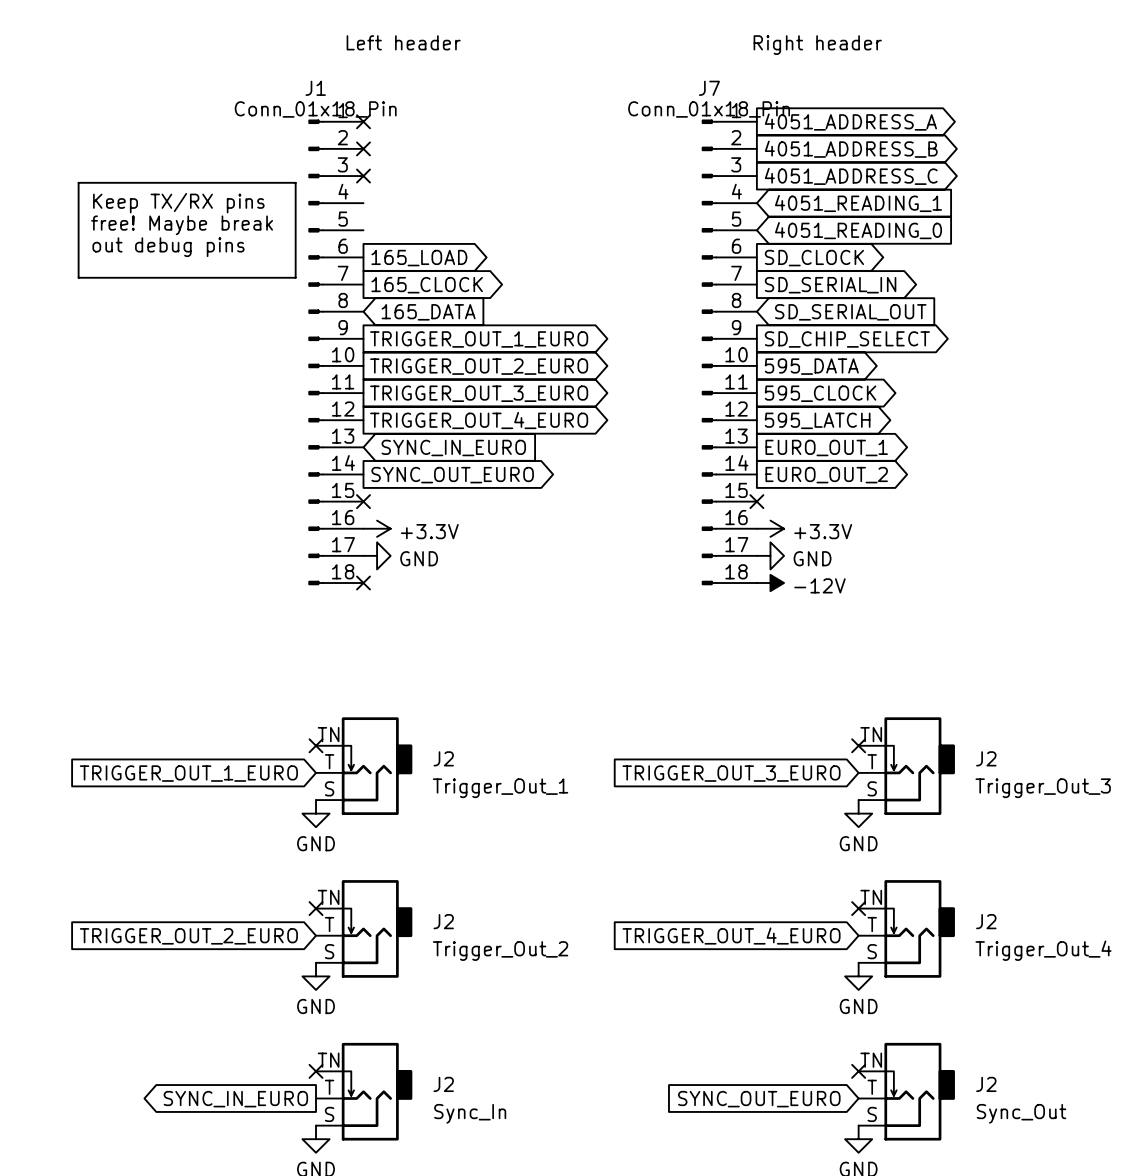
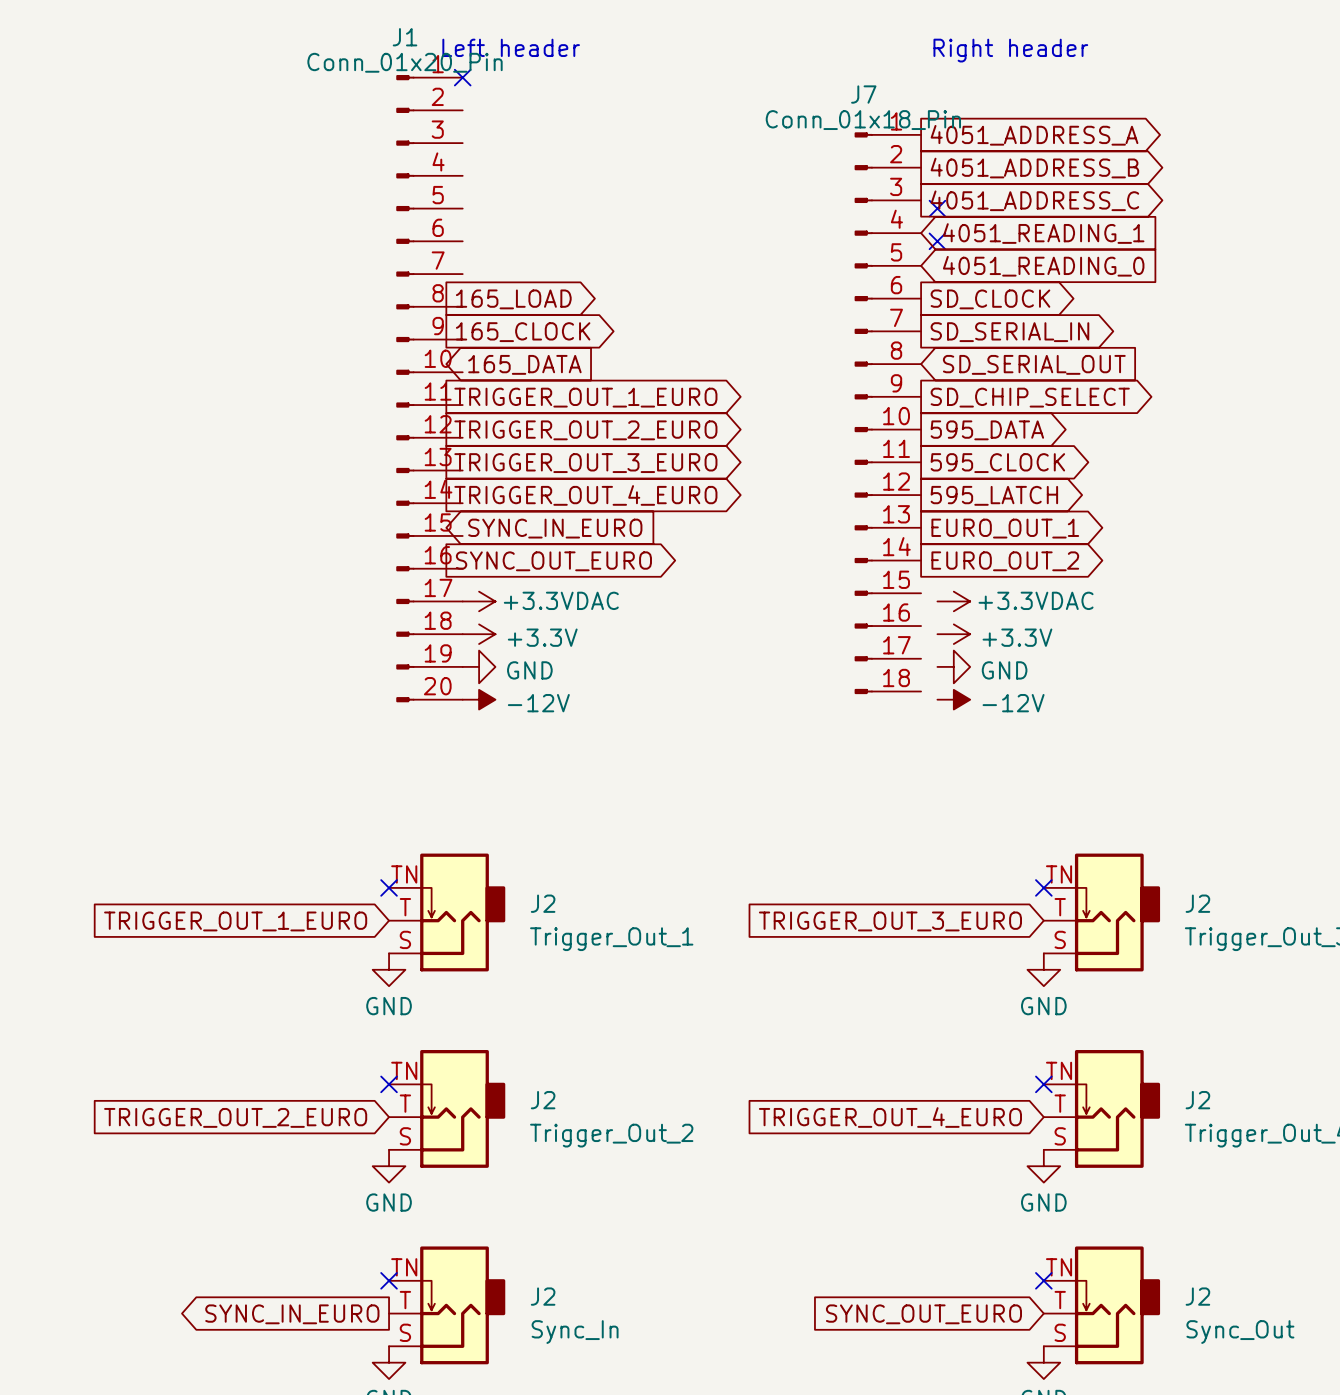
text position: Left header (403, 42) -> Left header (511, 47)
text position: Right header (817, 45) -> Right header (1010, 50)
no-connect mark: none -> (462, 77)
J1 name position: J1 (315, 88) -> J1 (405, 37)
J1 value: Conn_01x18_Pin (315, 109) -> Conn_01x20_Pin (405, 62)
J1 symbol: [308, 119, 364, 586] -> [396, 75, 463, 703]
no-connect mark: (363, 121) -> none
no-connect mark: (363, 148) -> none
no-connect mark: (363, 176) -> none
line: (78, 182) (295, 182) (295, 277) (78, 277) (78, 182) -> none
no-connect mark: none -> (937, 208)
text: Keep TX/RX pins (178, 203) -> none
no-connect mark: none -> (937, 241)
text: free! Maybe break (182, 225) -> none
text: out debug pins (168, 247) -> none
no-connect mark: (363, 501) -> none
no-connect mark: (756, 501) -> none
power symbol: none -> +3.3VDAC (479, 601)
power symbol: none -> +3.3VDAC (953, 601)
power symbol position: +3.3V (377, 528) -> +3.3V (479, 634)
power symbol position: +3.3V (770, 528) -> +3.3V (953, 634)
power symbol position: GND (377, 555) -> GND (479, 666)
power symbol position: GND (770, 555) -> GND (953, 666)
no-connect mark: (363, 583) -> none
power symbol position: -12V (770, 583) -> -12V (953, 699)
power symbol: none -> -12V (479, 699)

